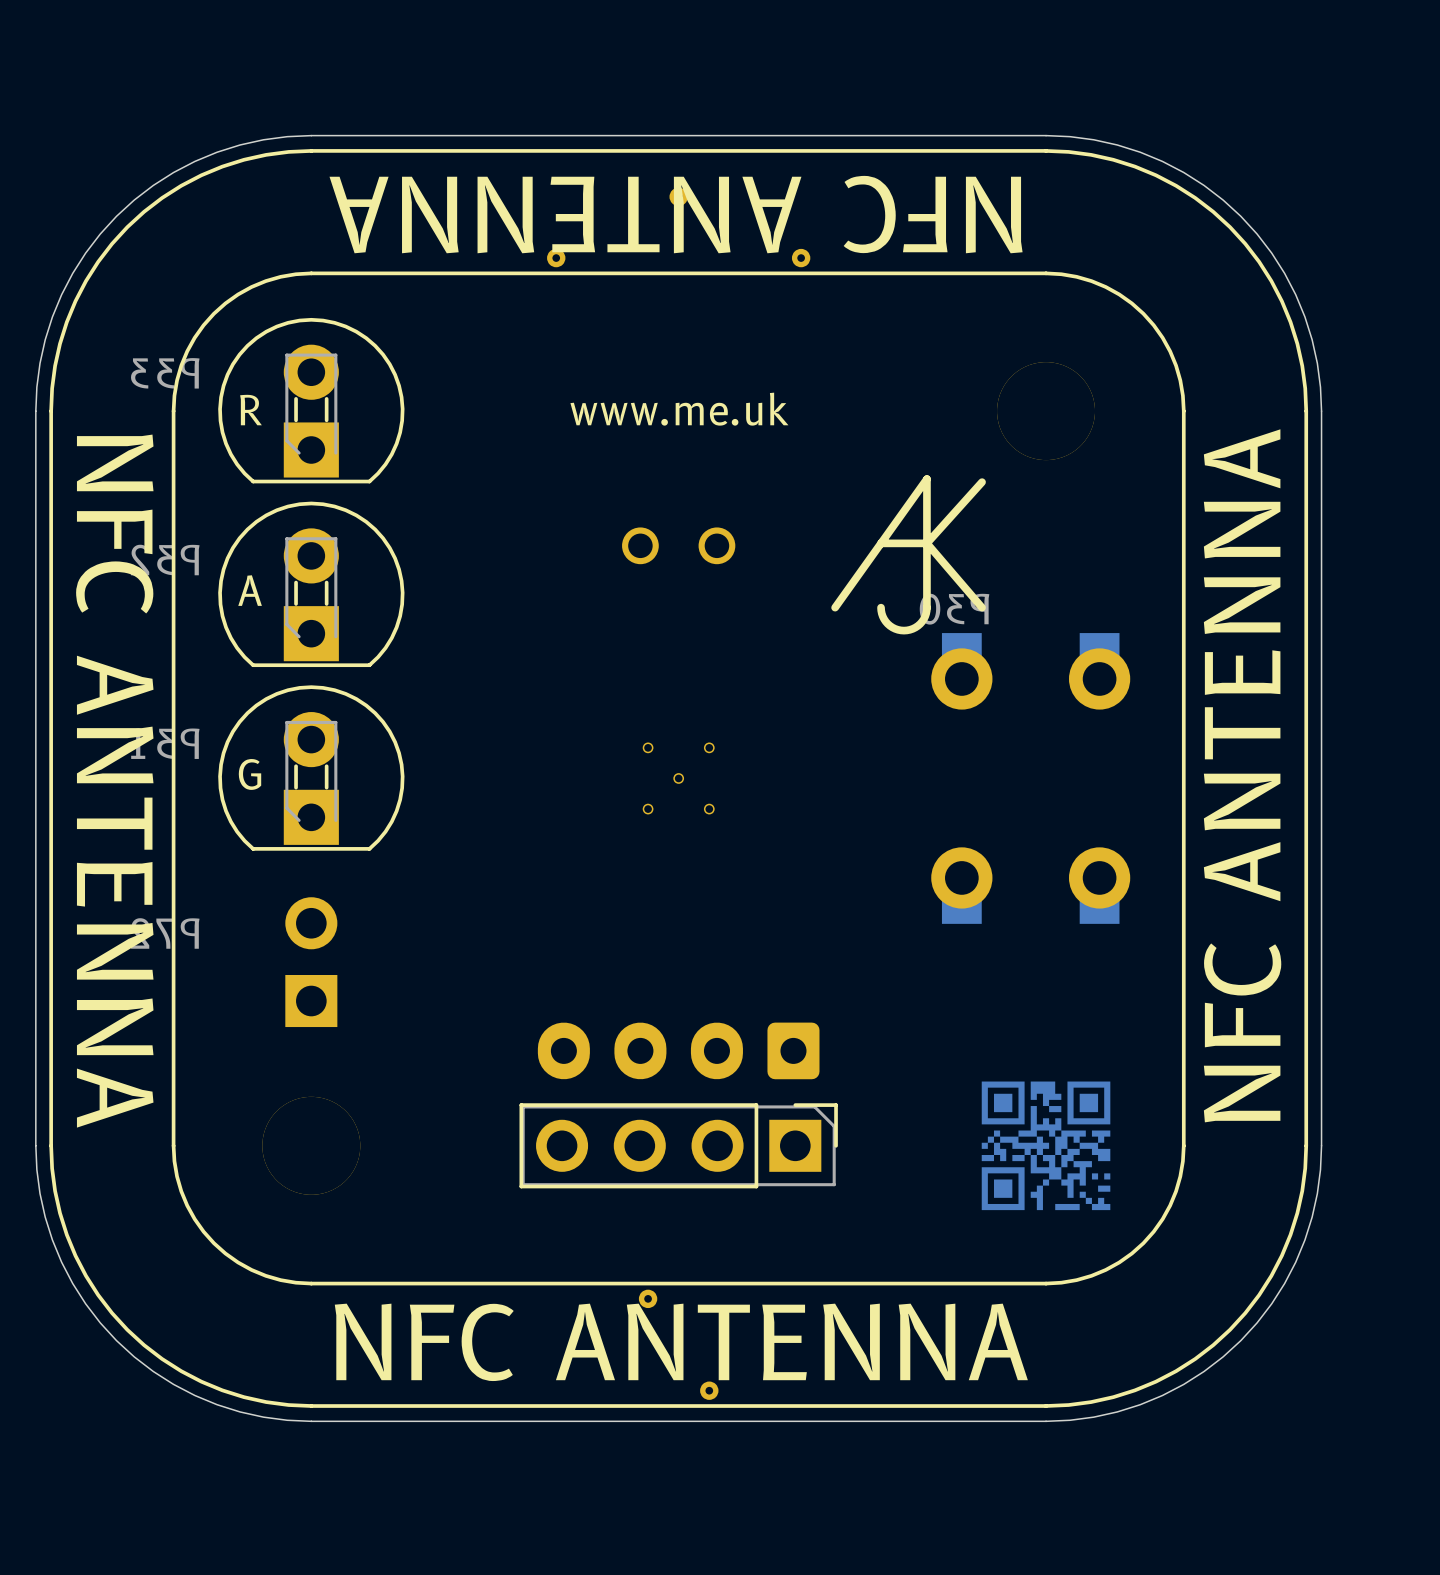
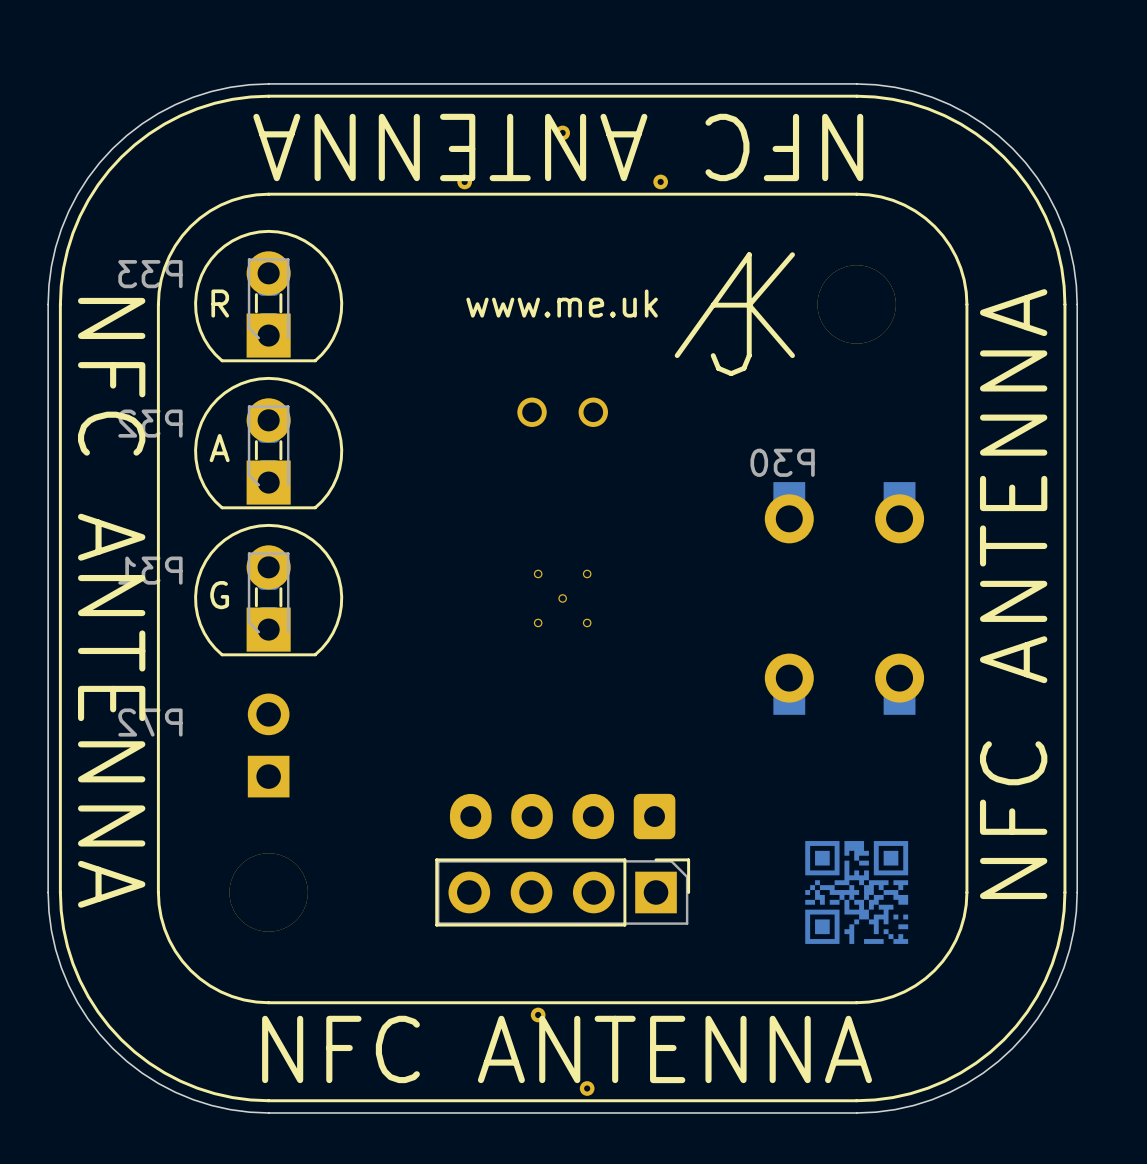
part footprint: [218, 317, 405, 484] -> [194, 229, 344, 363]
drawing: none -> [674, 252, 795, 377]
drawing: [831, 475, 986, 635] -> none
part footprint: [218, 501, 405, 668] -> [194, 376, 344, 510]
part footprint: [218, 685, 405, 851] -> [194, 523, 344, 657]

